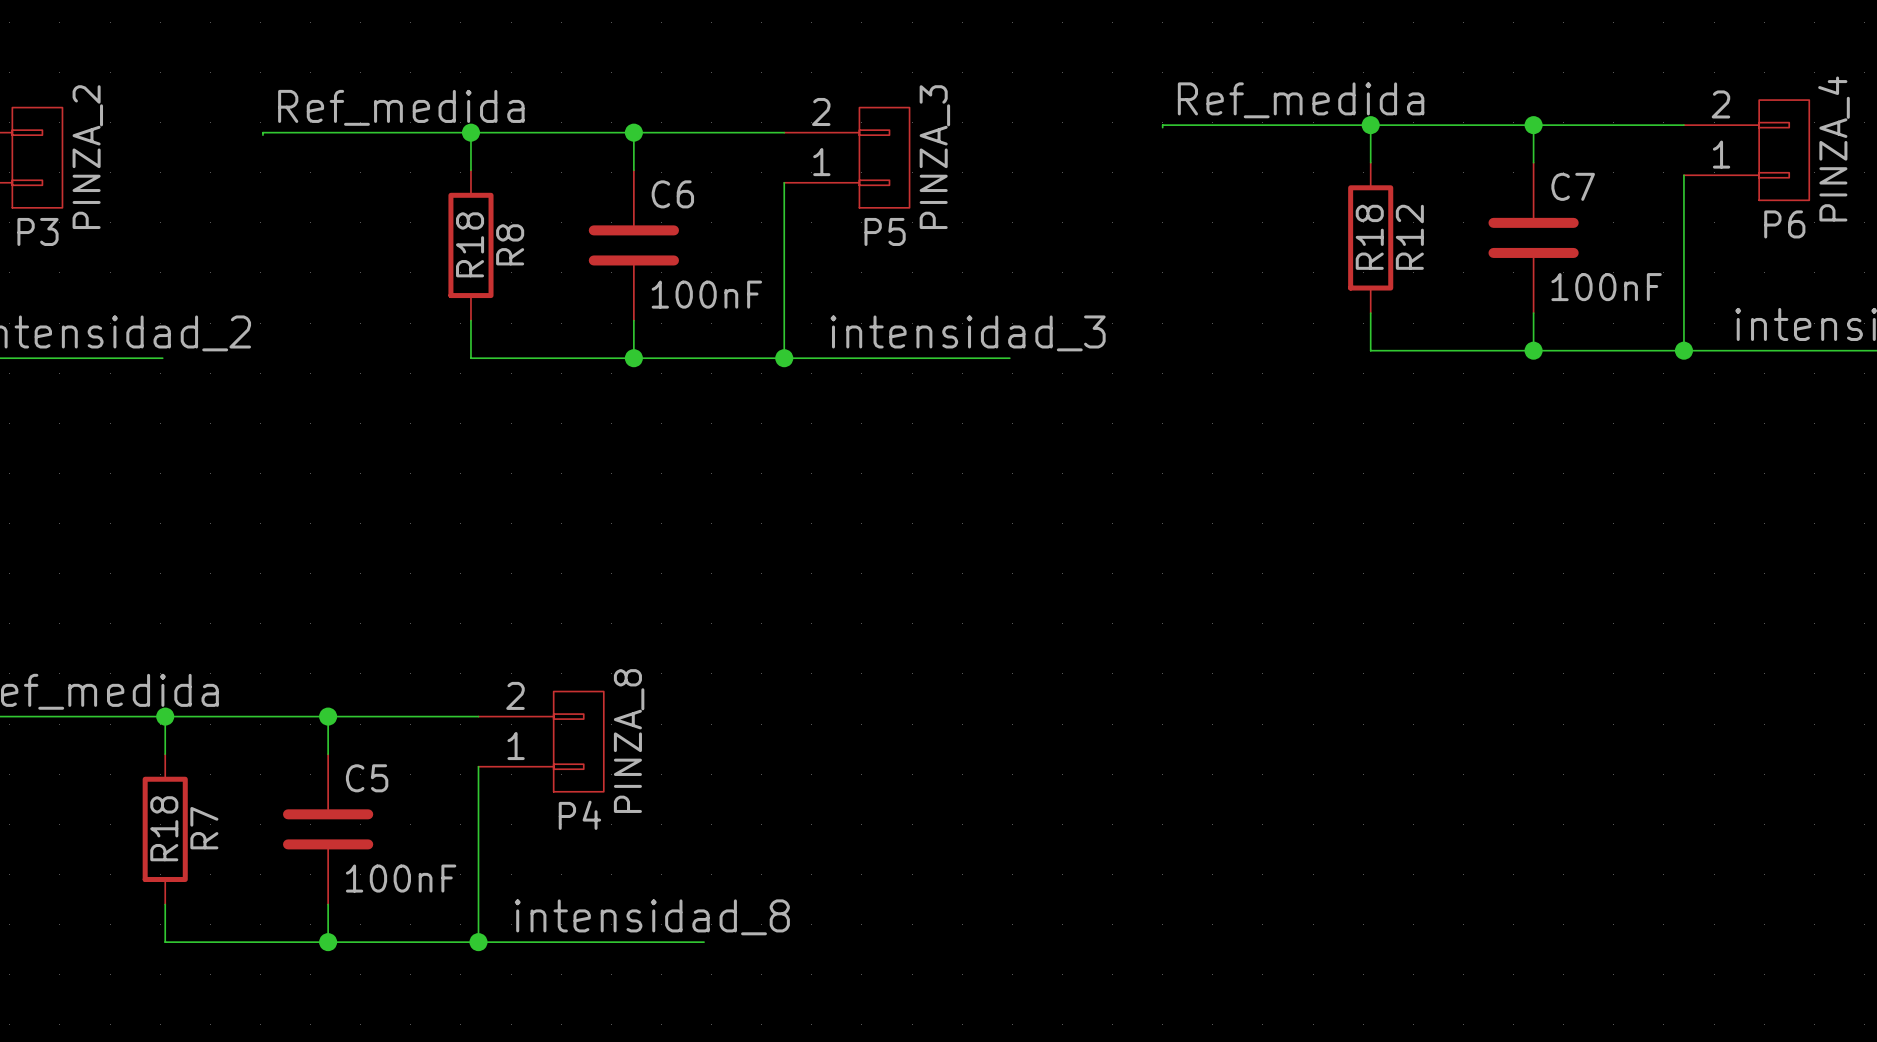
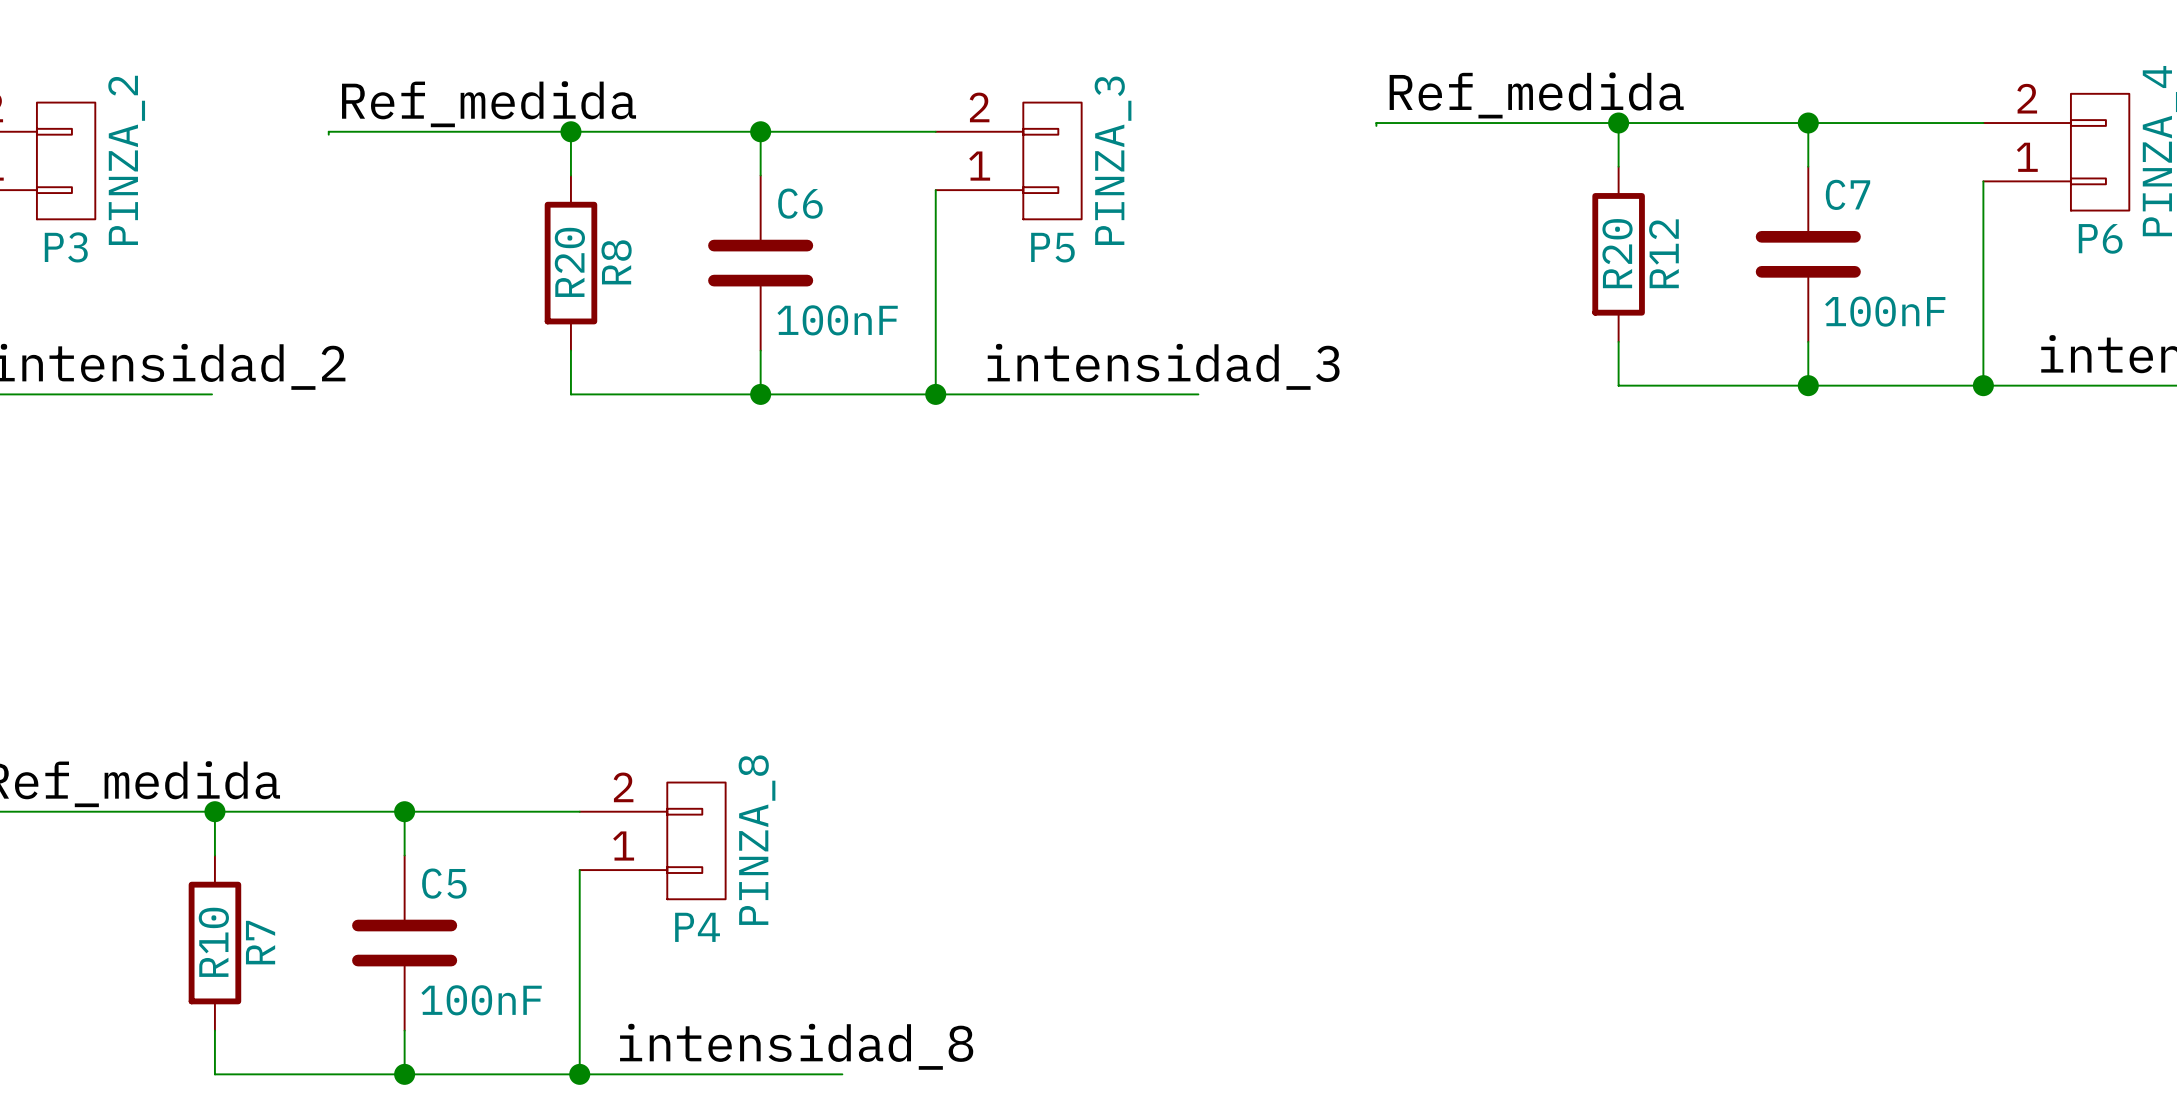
R12 value: R18 (1369, 237) -> R20 (1617, 253)
R8 value: R18 (470, 244) -> R20 (569, 262)
R7 value: R18 (164, 828) -> R10 (213, 942)

